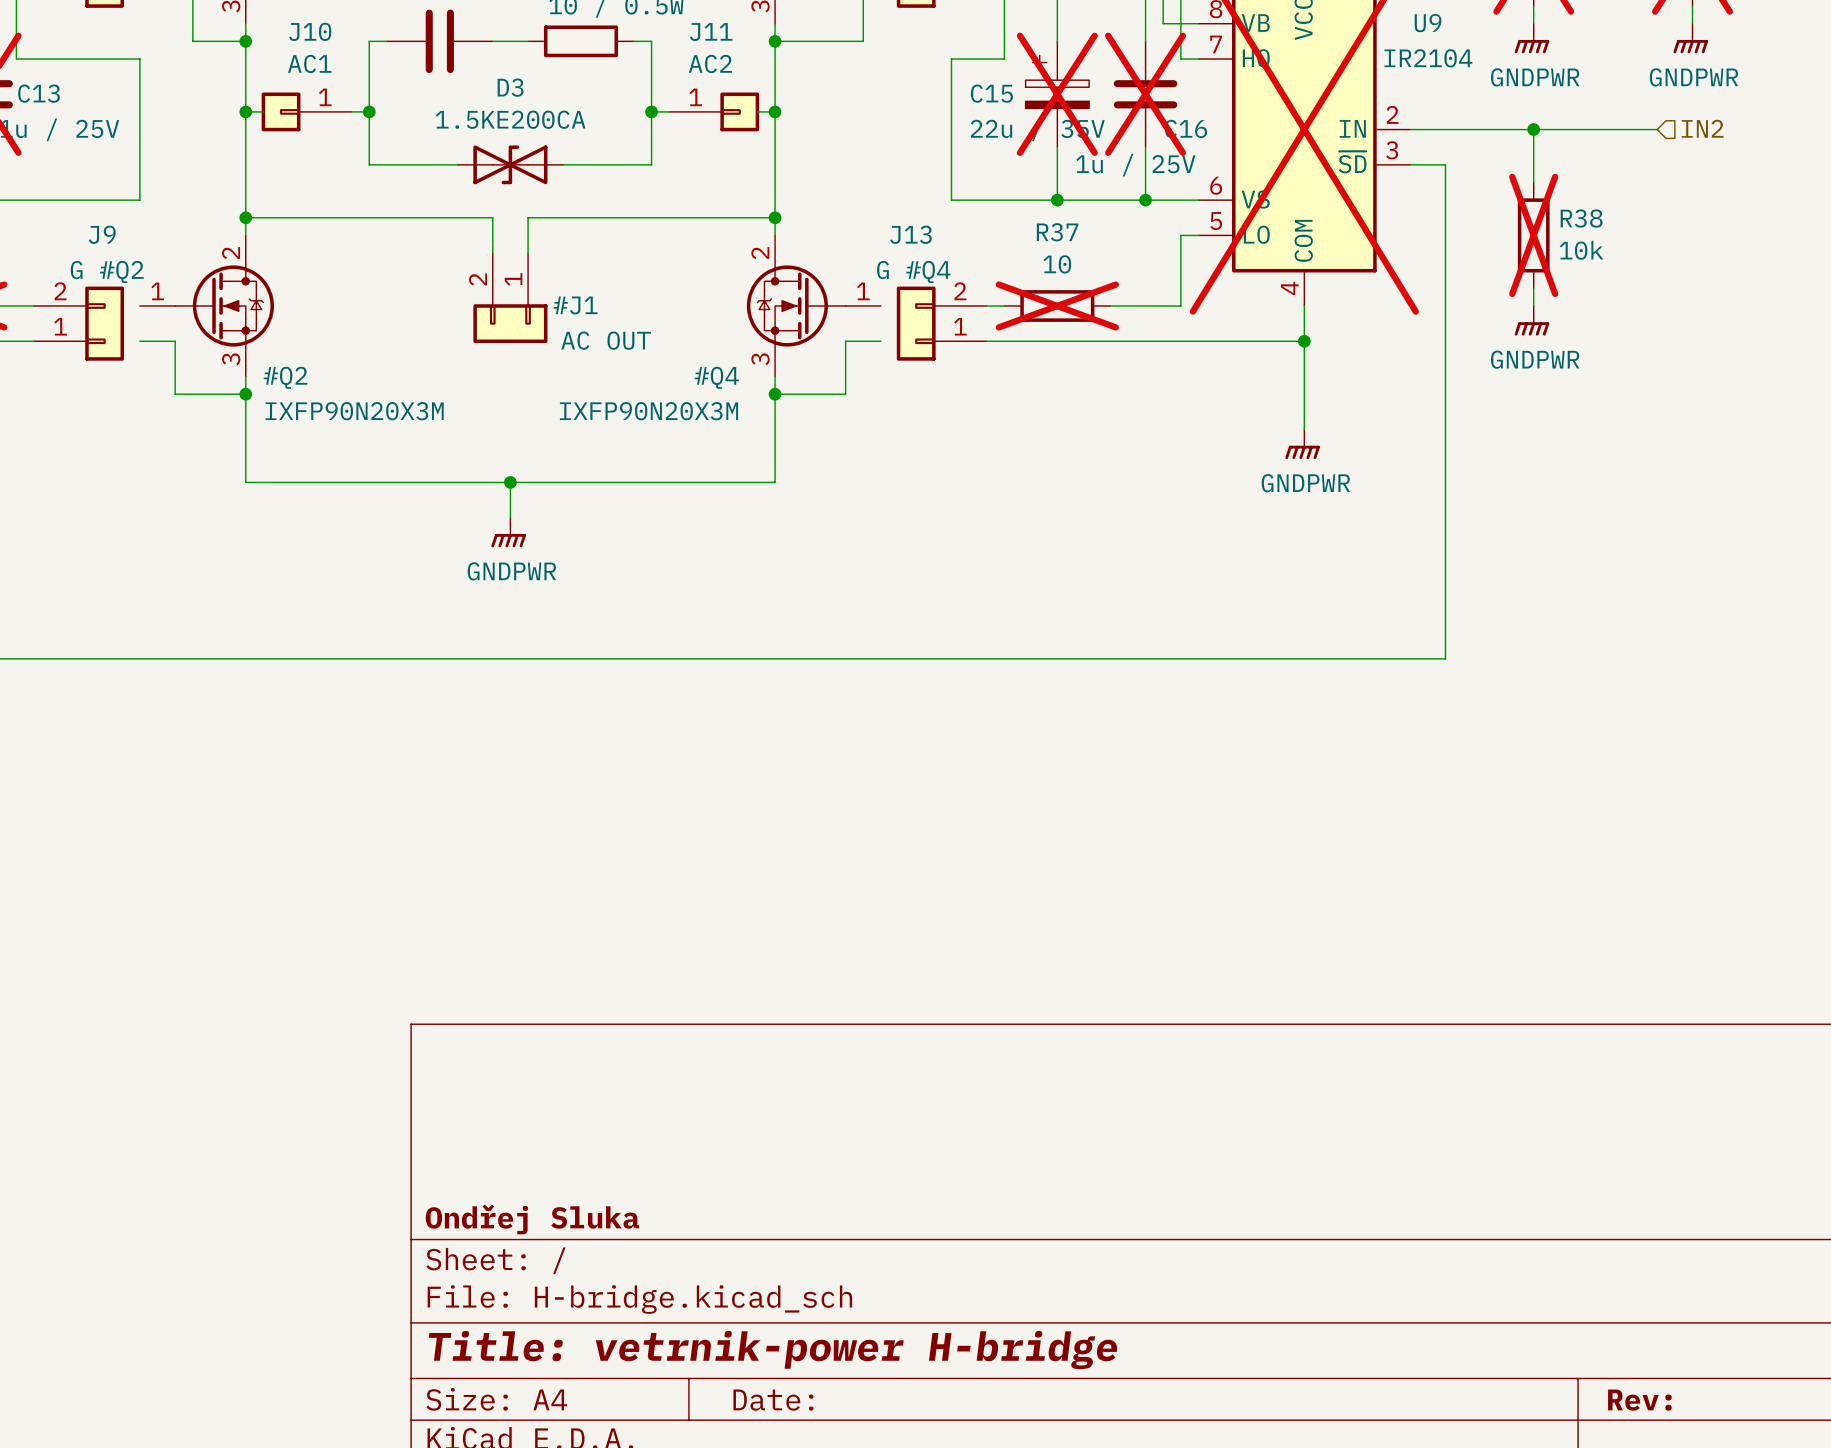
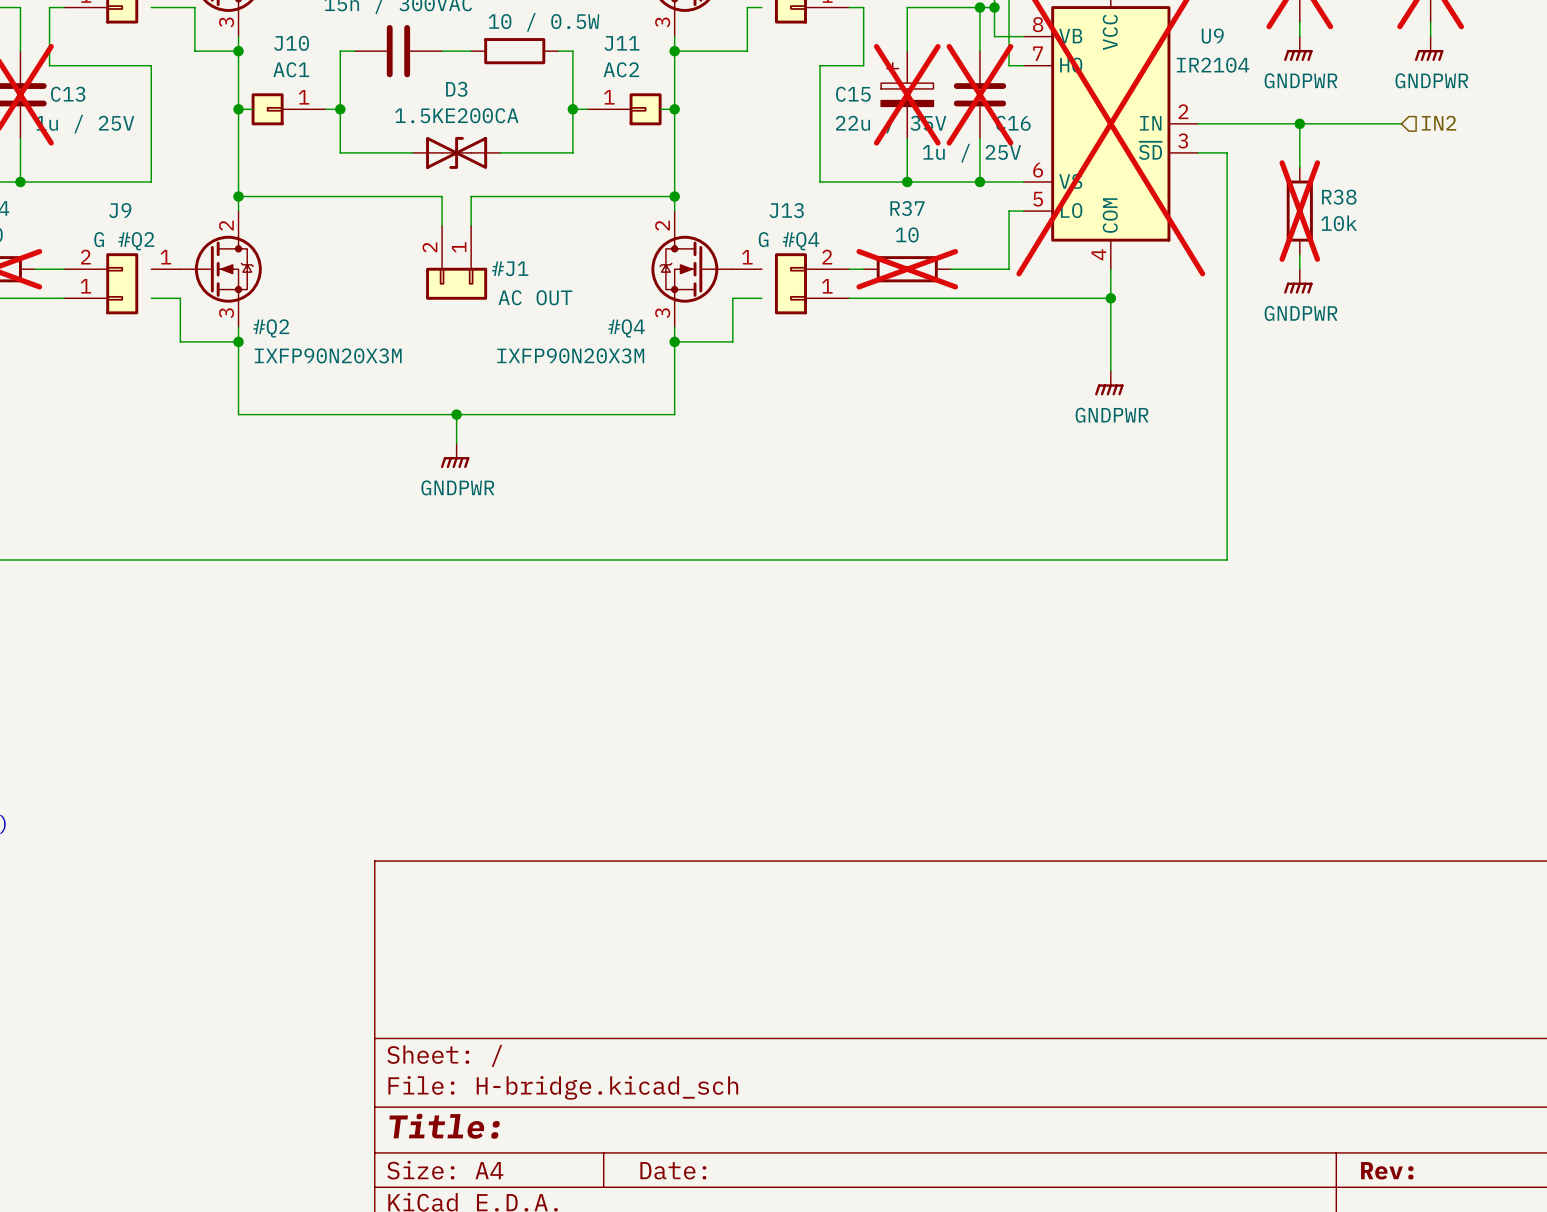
title block: Ondřej Sluka (532, 1219) -> none
title block: Title: vetrnik-power H-bridge (773, 1350) -> Title: (444, 1126)

